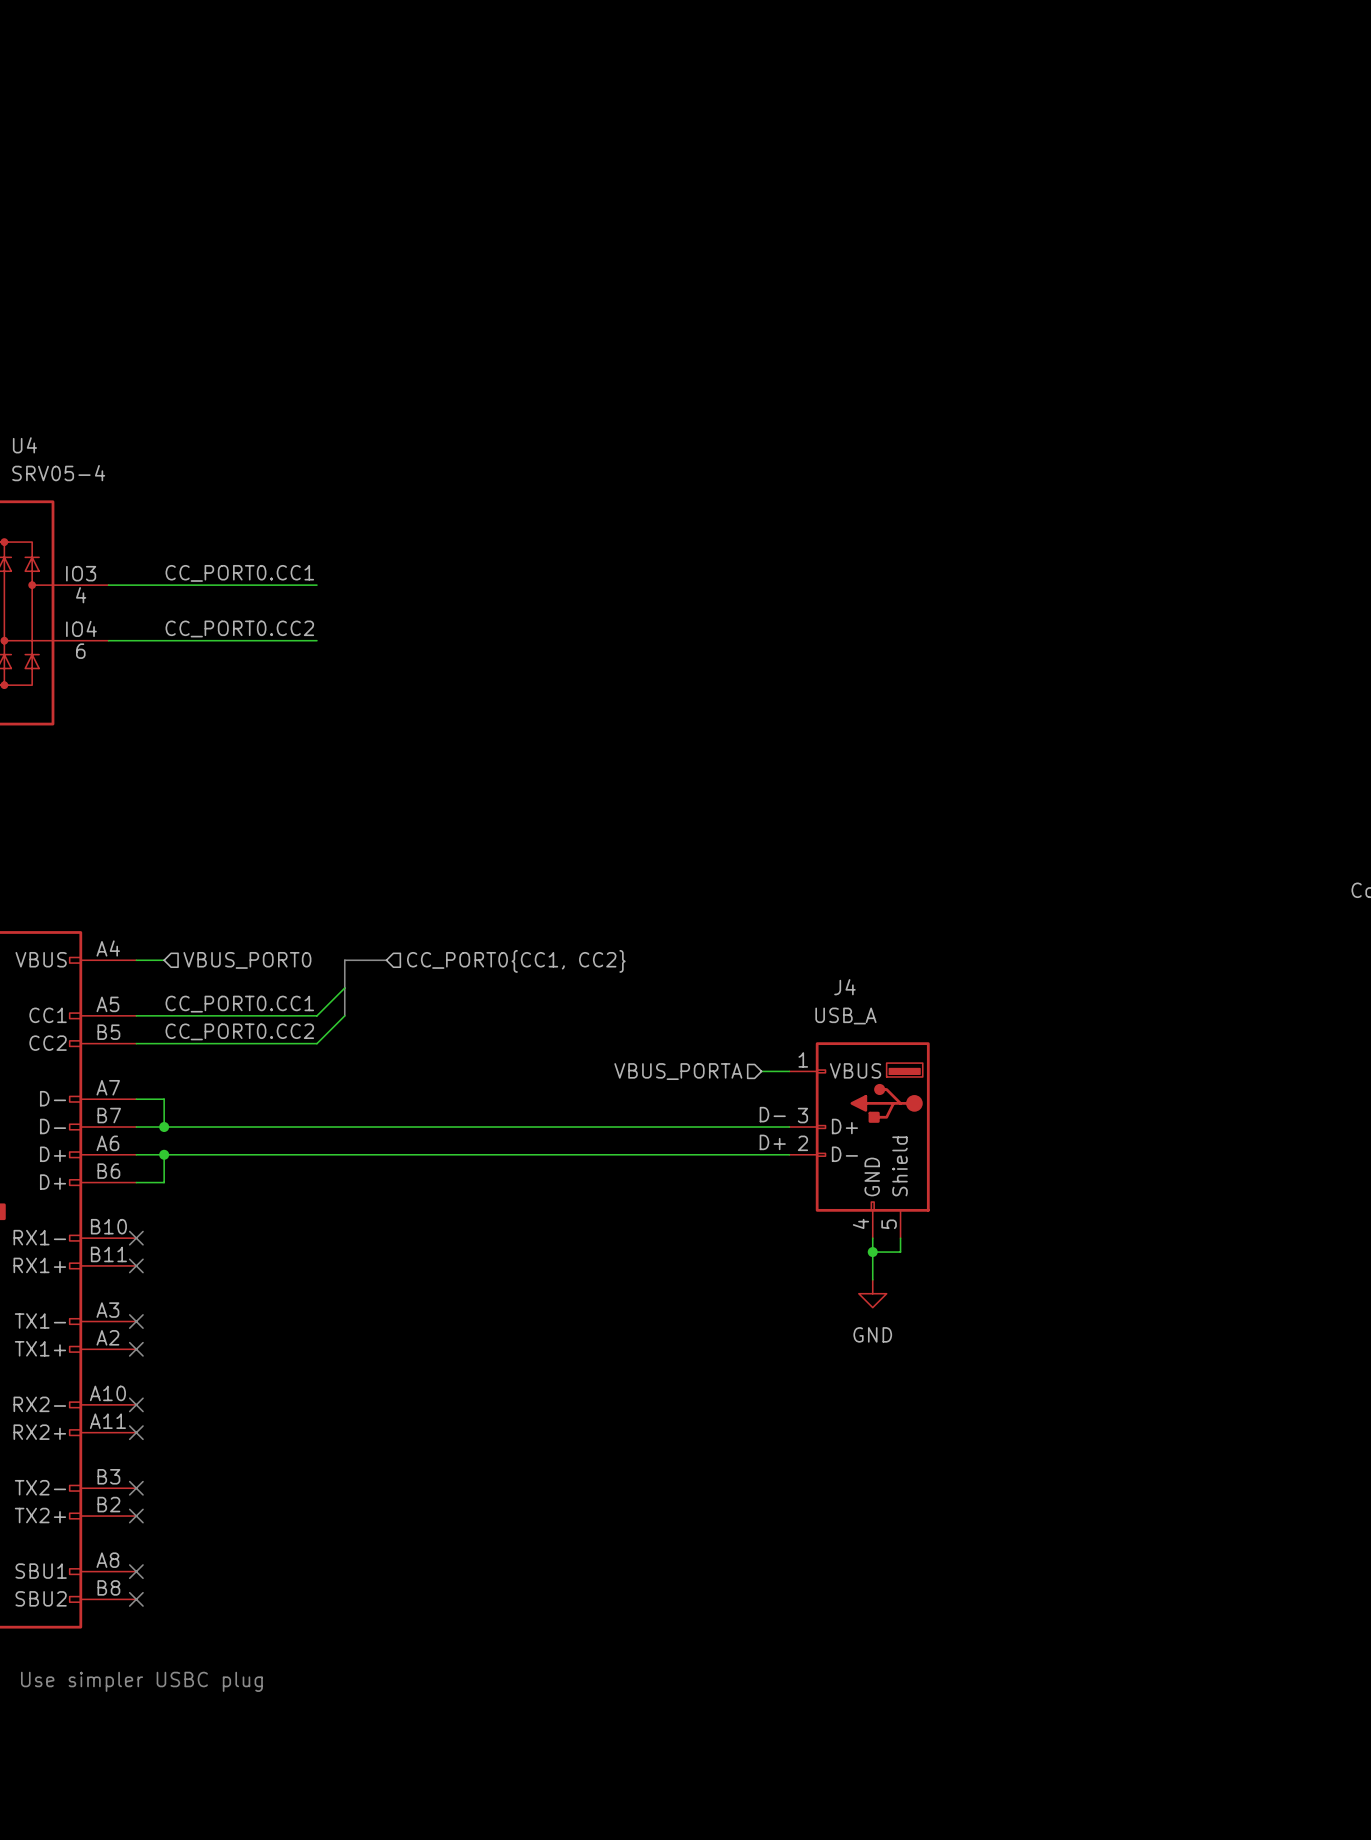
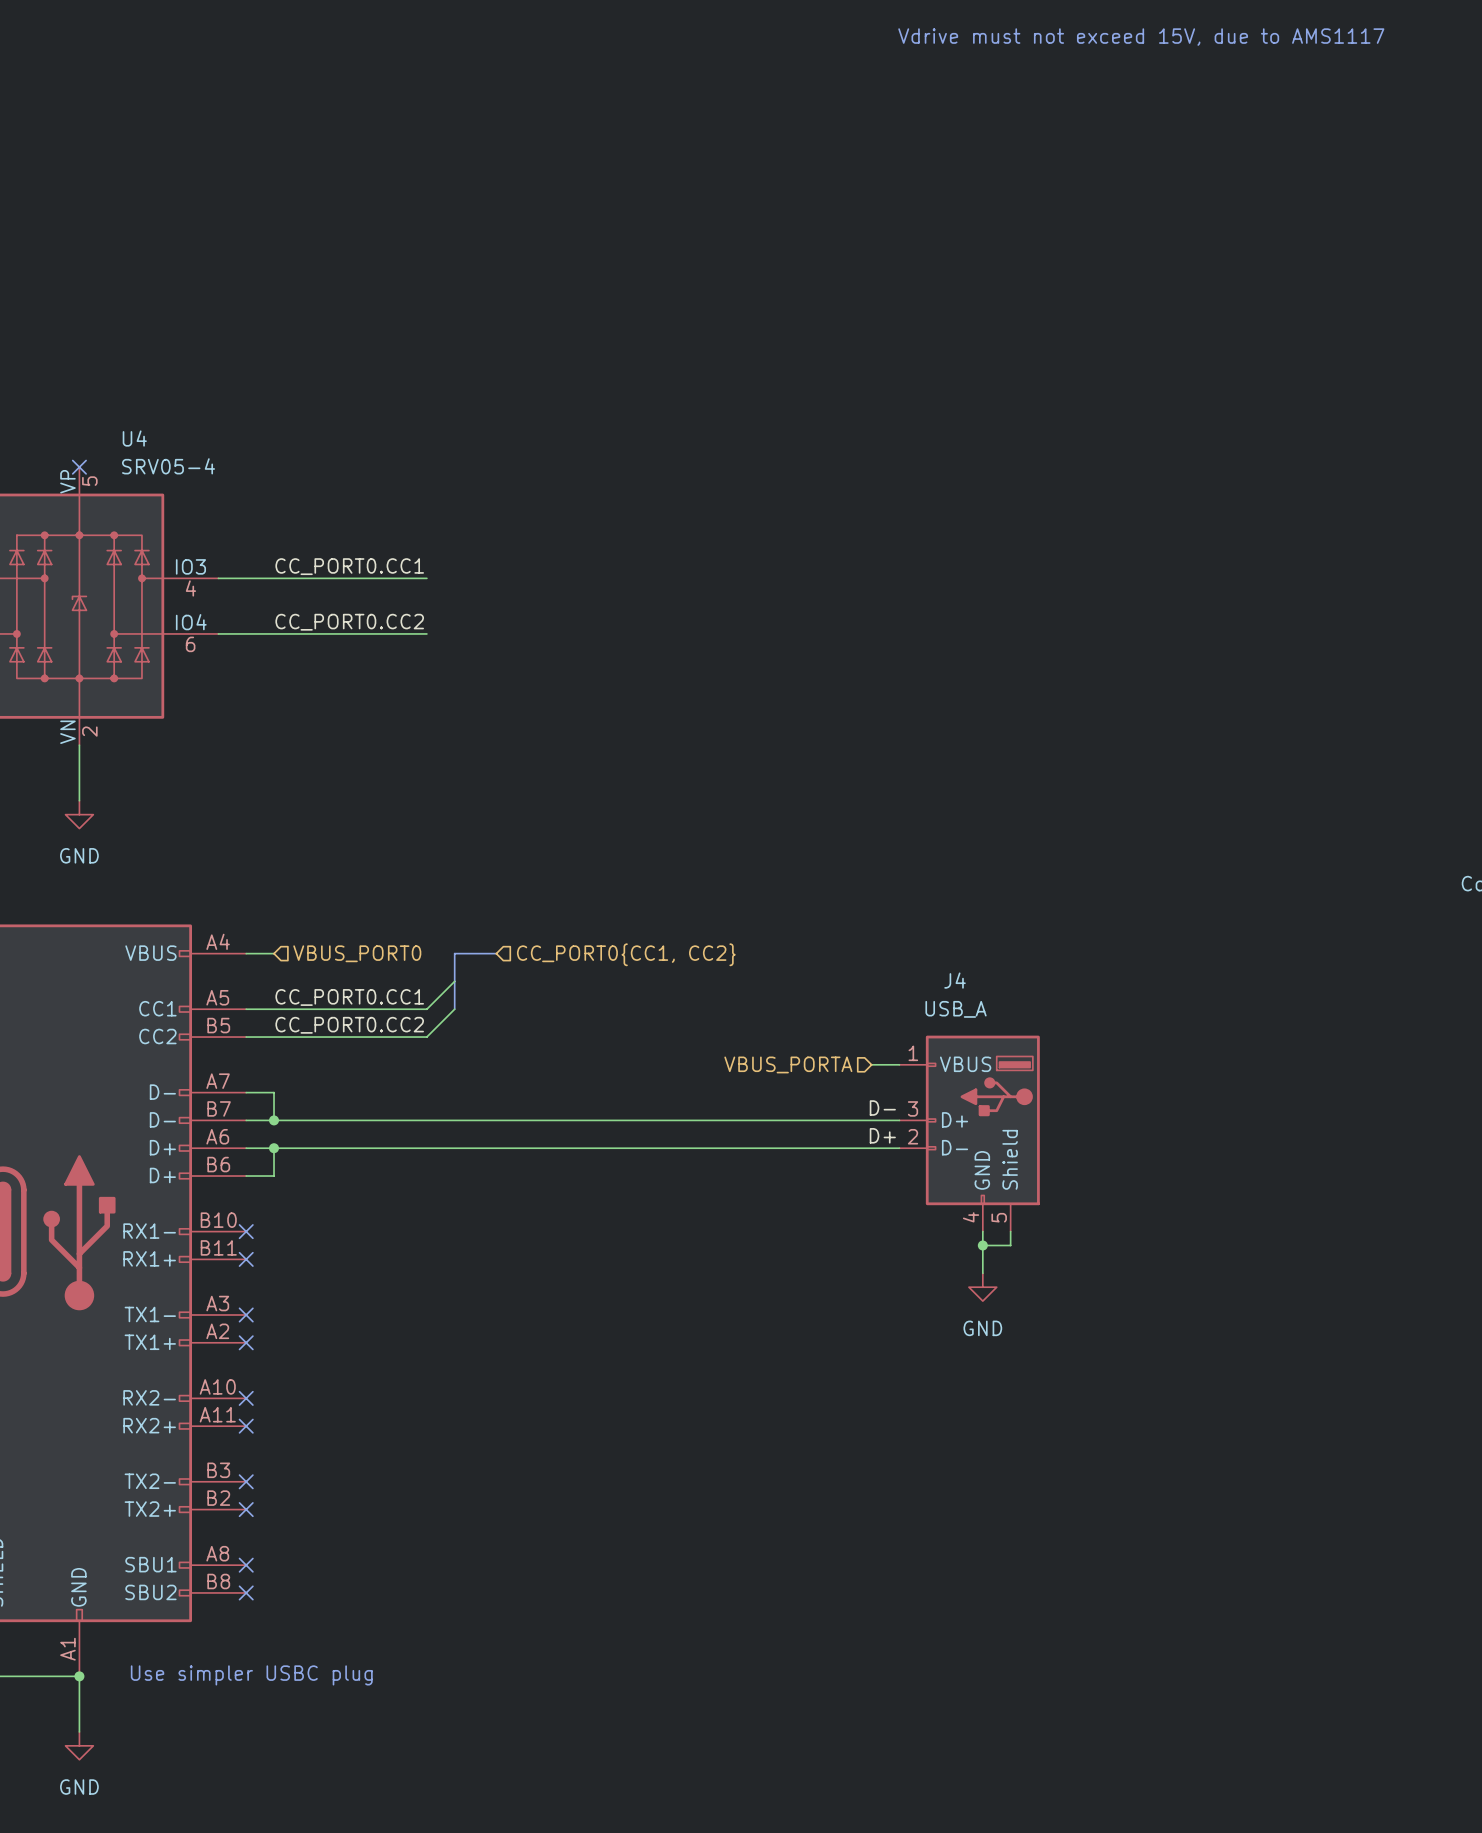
text: none -> Vdrive must not exceed 15V, due to AMS1117 (1141, 37)

